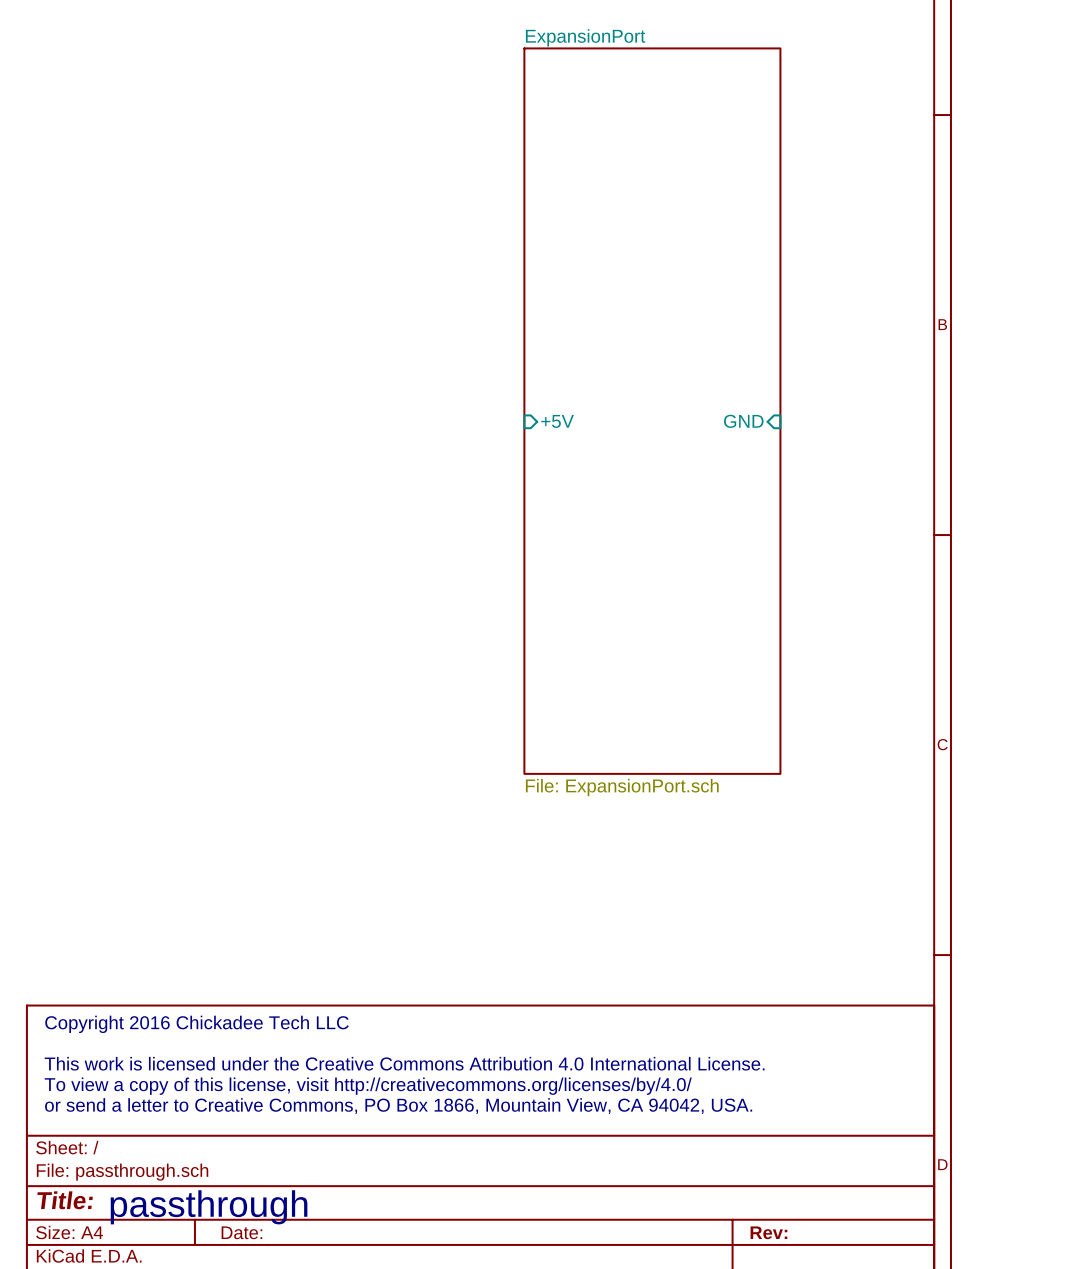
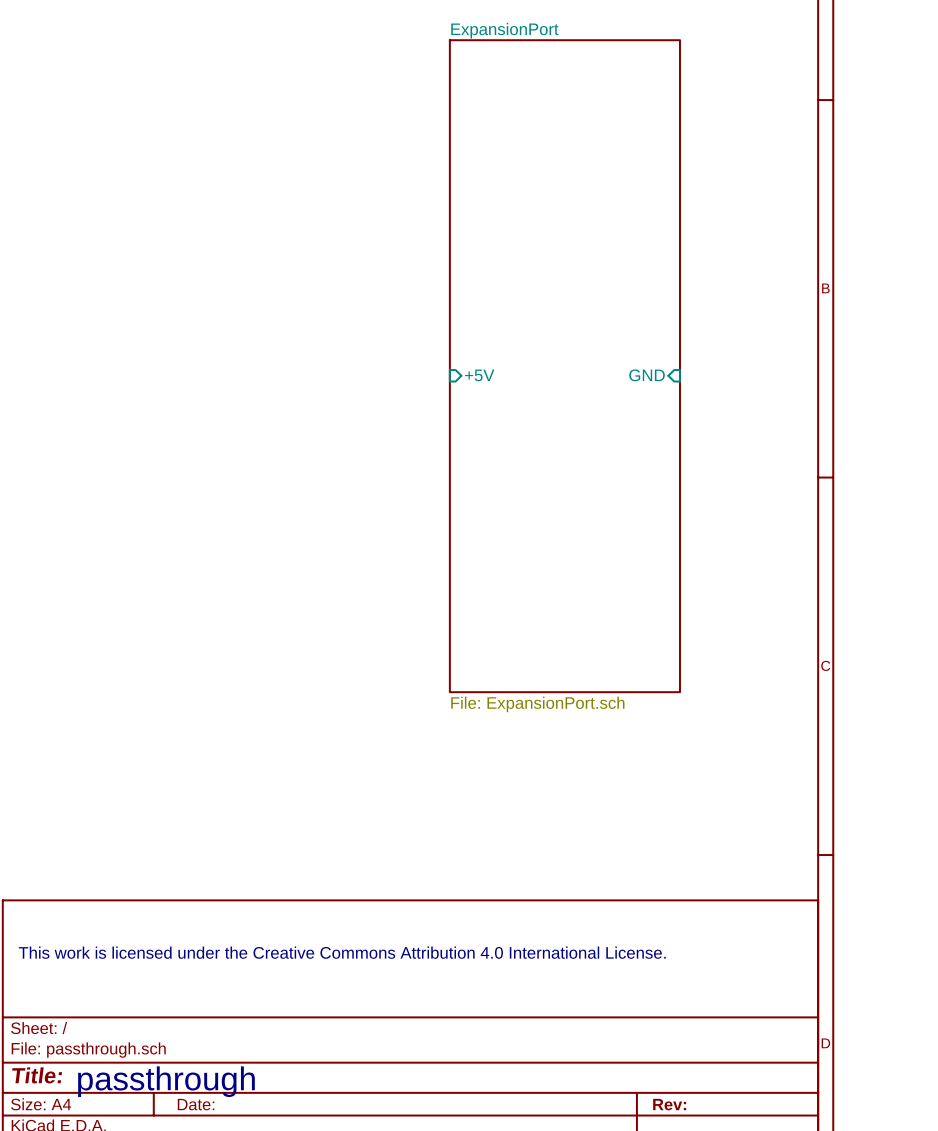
text: Copyright 2016 Chickadee Tech LLC (196, 1024) -> none
text: To view a copy of this license, visit http://creativecommons.org/licenses/by/4.0/ (368, 1086) -> none
text: or send a letter to Creative Commons, PO Box 1866, Mountain View, CA 94042, USA. (398, 1106) -> none

